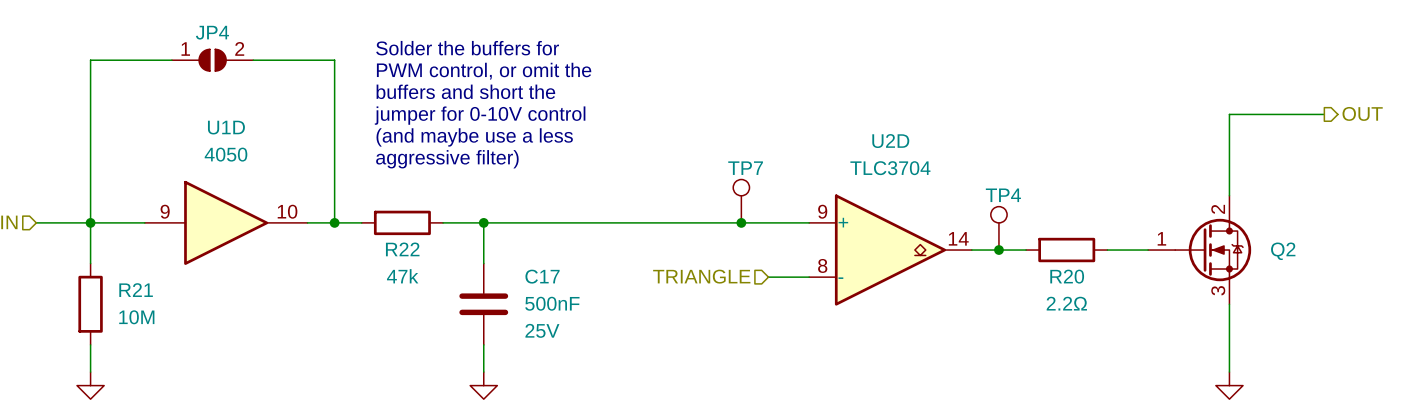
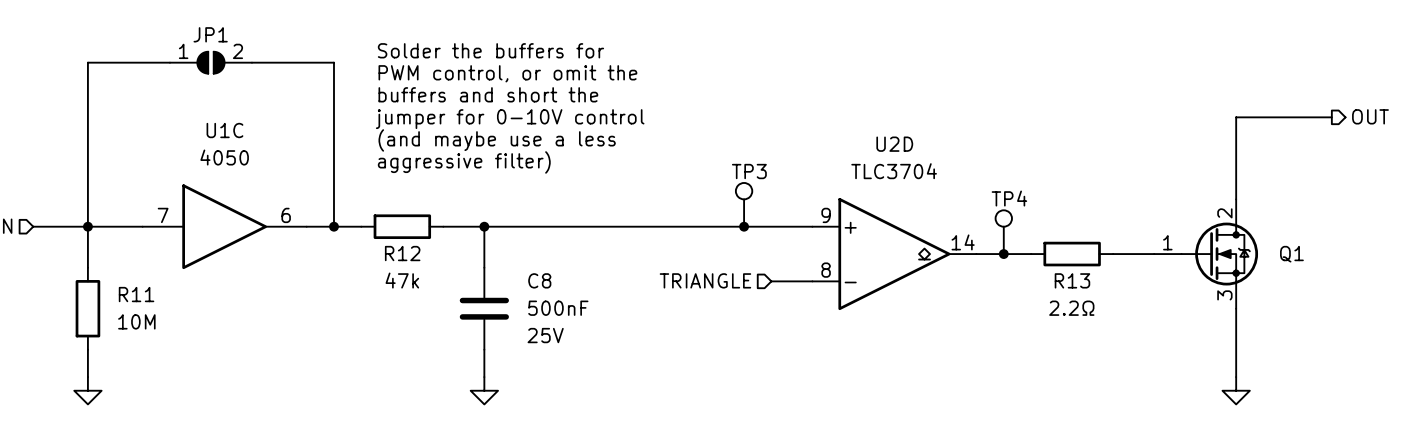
JP4 name: JP4 (212, 32) -> JP1 (210, 34)
U1D name: U1D (226, 127) -> U1C (224, 130)
TP7 name: TP7 (745, 168) -> TP3 (749, 171)
U1D pin number: 9 (165, 211) -> 7 (163, 215)
U1D pin number: 10 (287, 211) -> 6 (286, 215)
R22 name: R22 (402, 249) -> R12 (402, 253)
Q2 name: Q2 (1283, 251) -> Q1 (1291, 254)
C17 name: C17 (542, 276) -> C8 (539, 280)
R20 name: R20 (1067, 276) -> R13 (1072, 280)
R21 name: R21 (136, 290) -> R11 (136, 294)

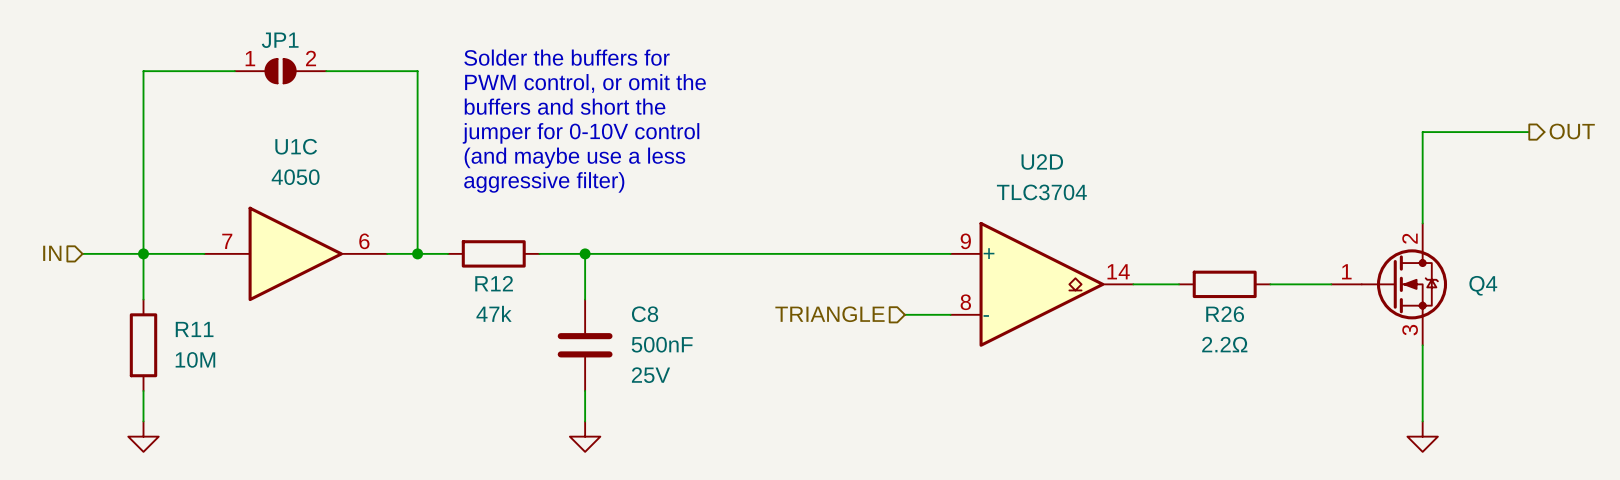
TP3: (744, 204) -> none
junction: (744, 226) -> none
TP4: (1003, 232) -> none
junction: (1003, 254) -> none
R26: none -> 2.2Ω (1224, 284)
R13: 2.2Ω (1072, 254) -> none
Q1 name: Q1 (1291, 254) -> Q4 (1483, 285)

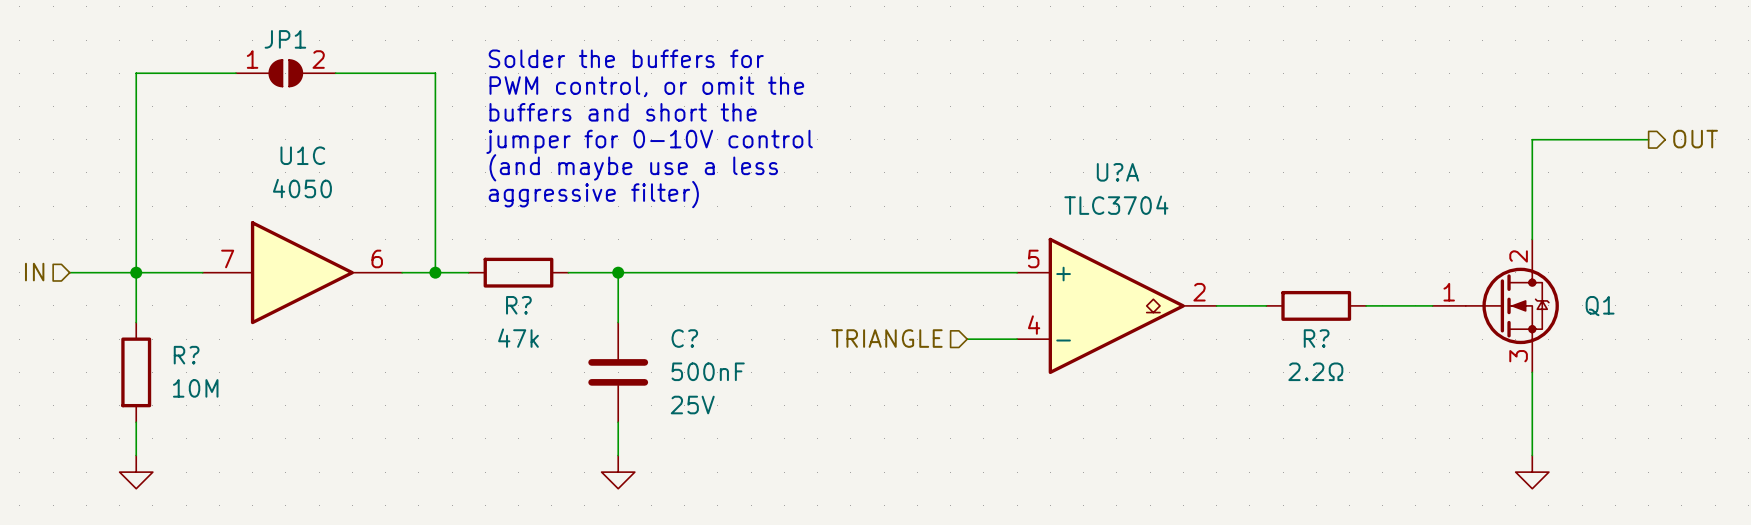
U2D name: U2D (1042, 161) -> U?A (1117, 172)
U2D pin number: 9 (965, 241) -> 5 (1033, 258)
U2D pin number: 14 (1118, 271) -> 2 (1199, 292)
R12 name: R12 (494, 283) -> R? (518, 305)
Q4 name: Q4 (1483, 285) -> Q1 (1600, 306)
U2D pin number: 8 (965, 302) -> 4 (1034, 325)
C8 name: C8 (645, 314) -> C? (684, 338)
R26 name: R26 (1225, 314) -> R? (1316, 338)
R11 name: R11 (194, 329) -> R? (186, 355)

